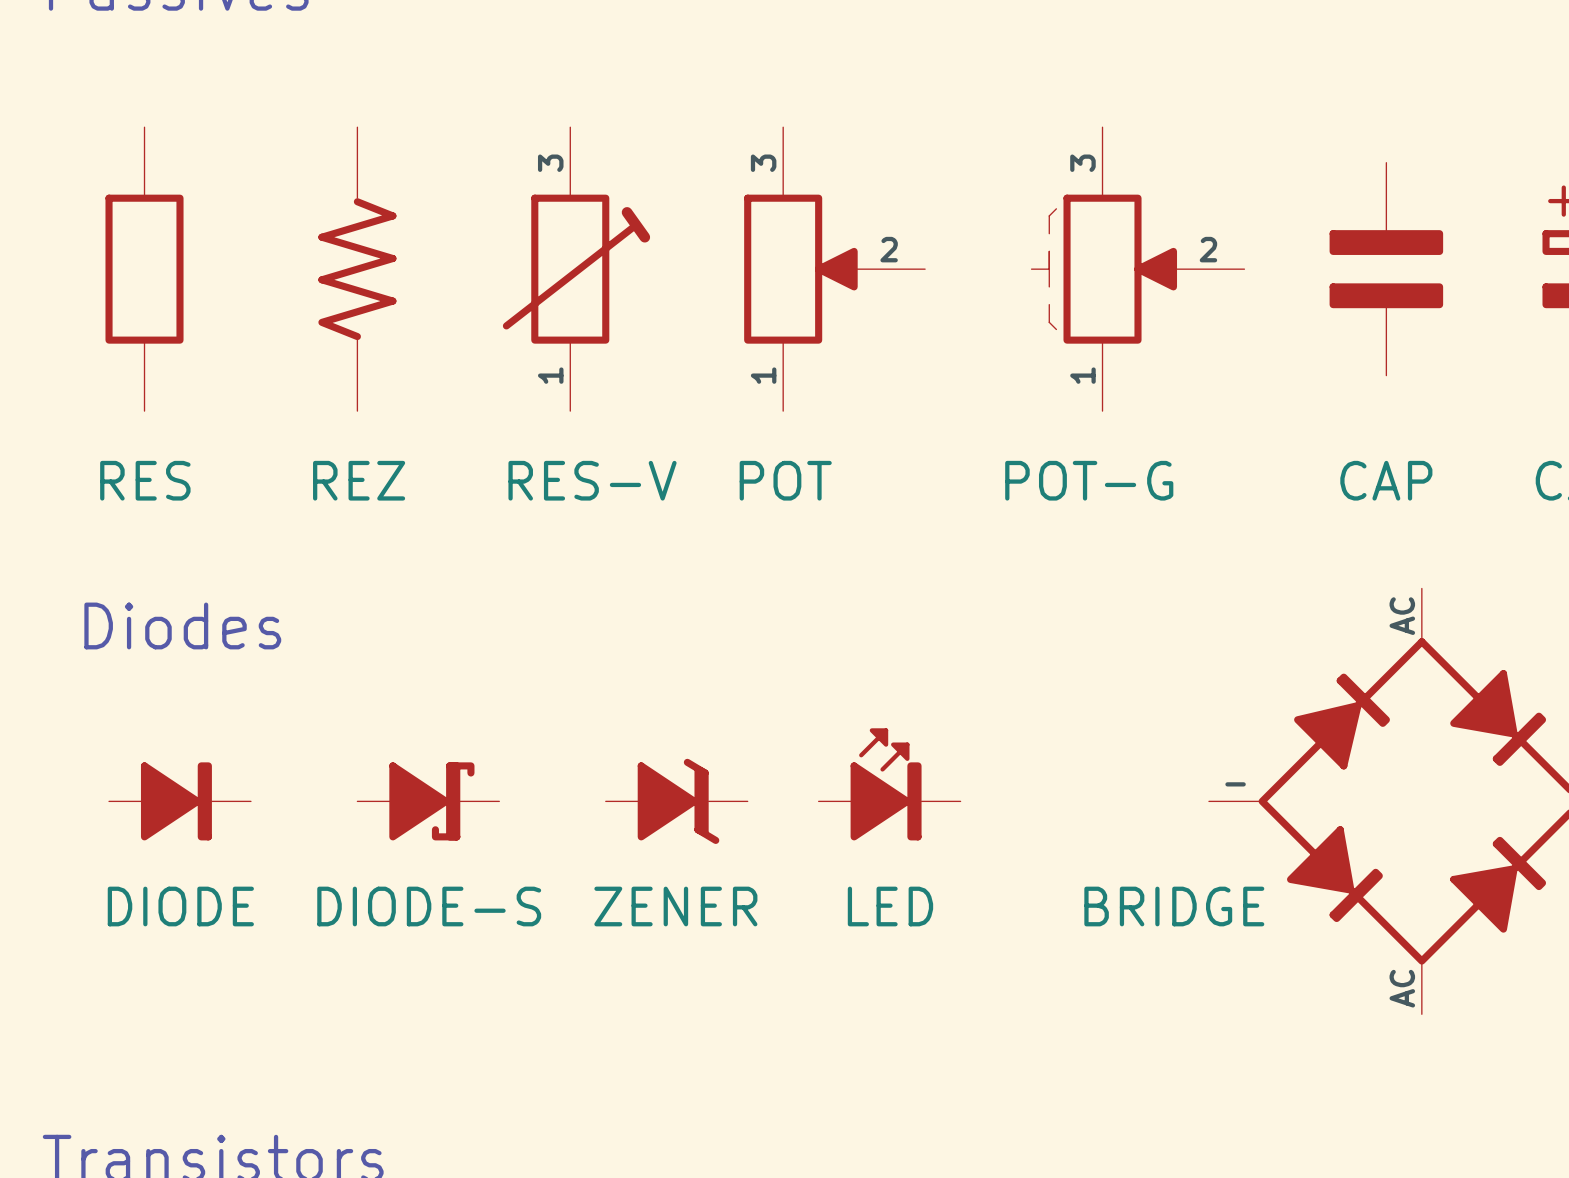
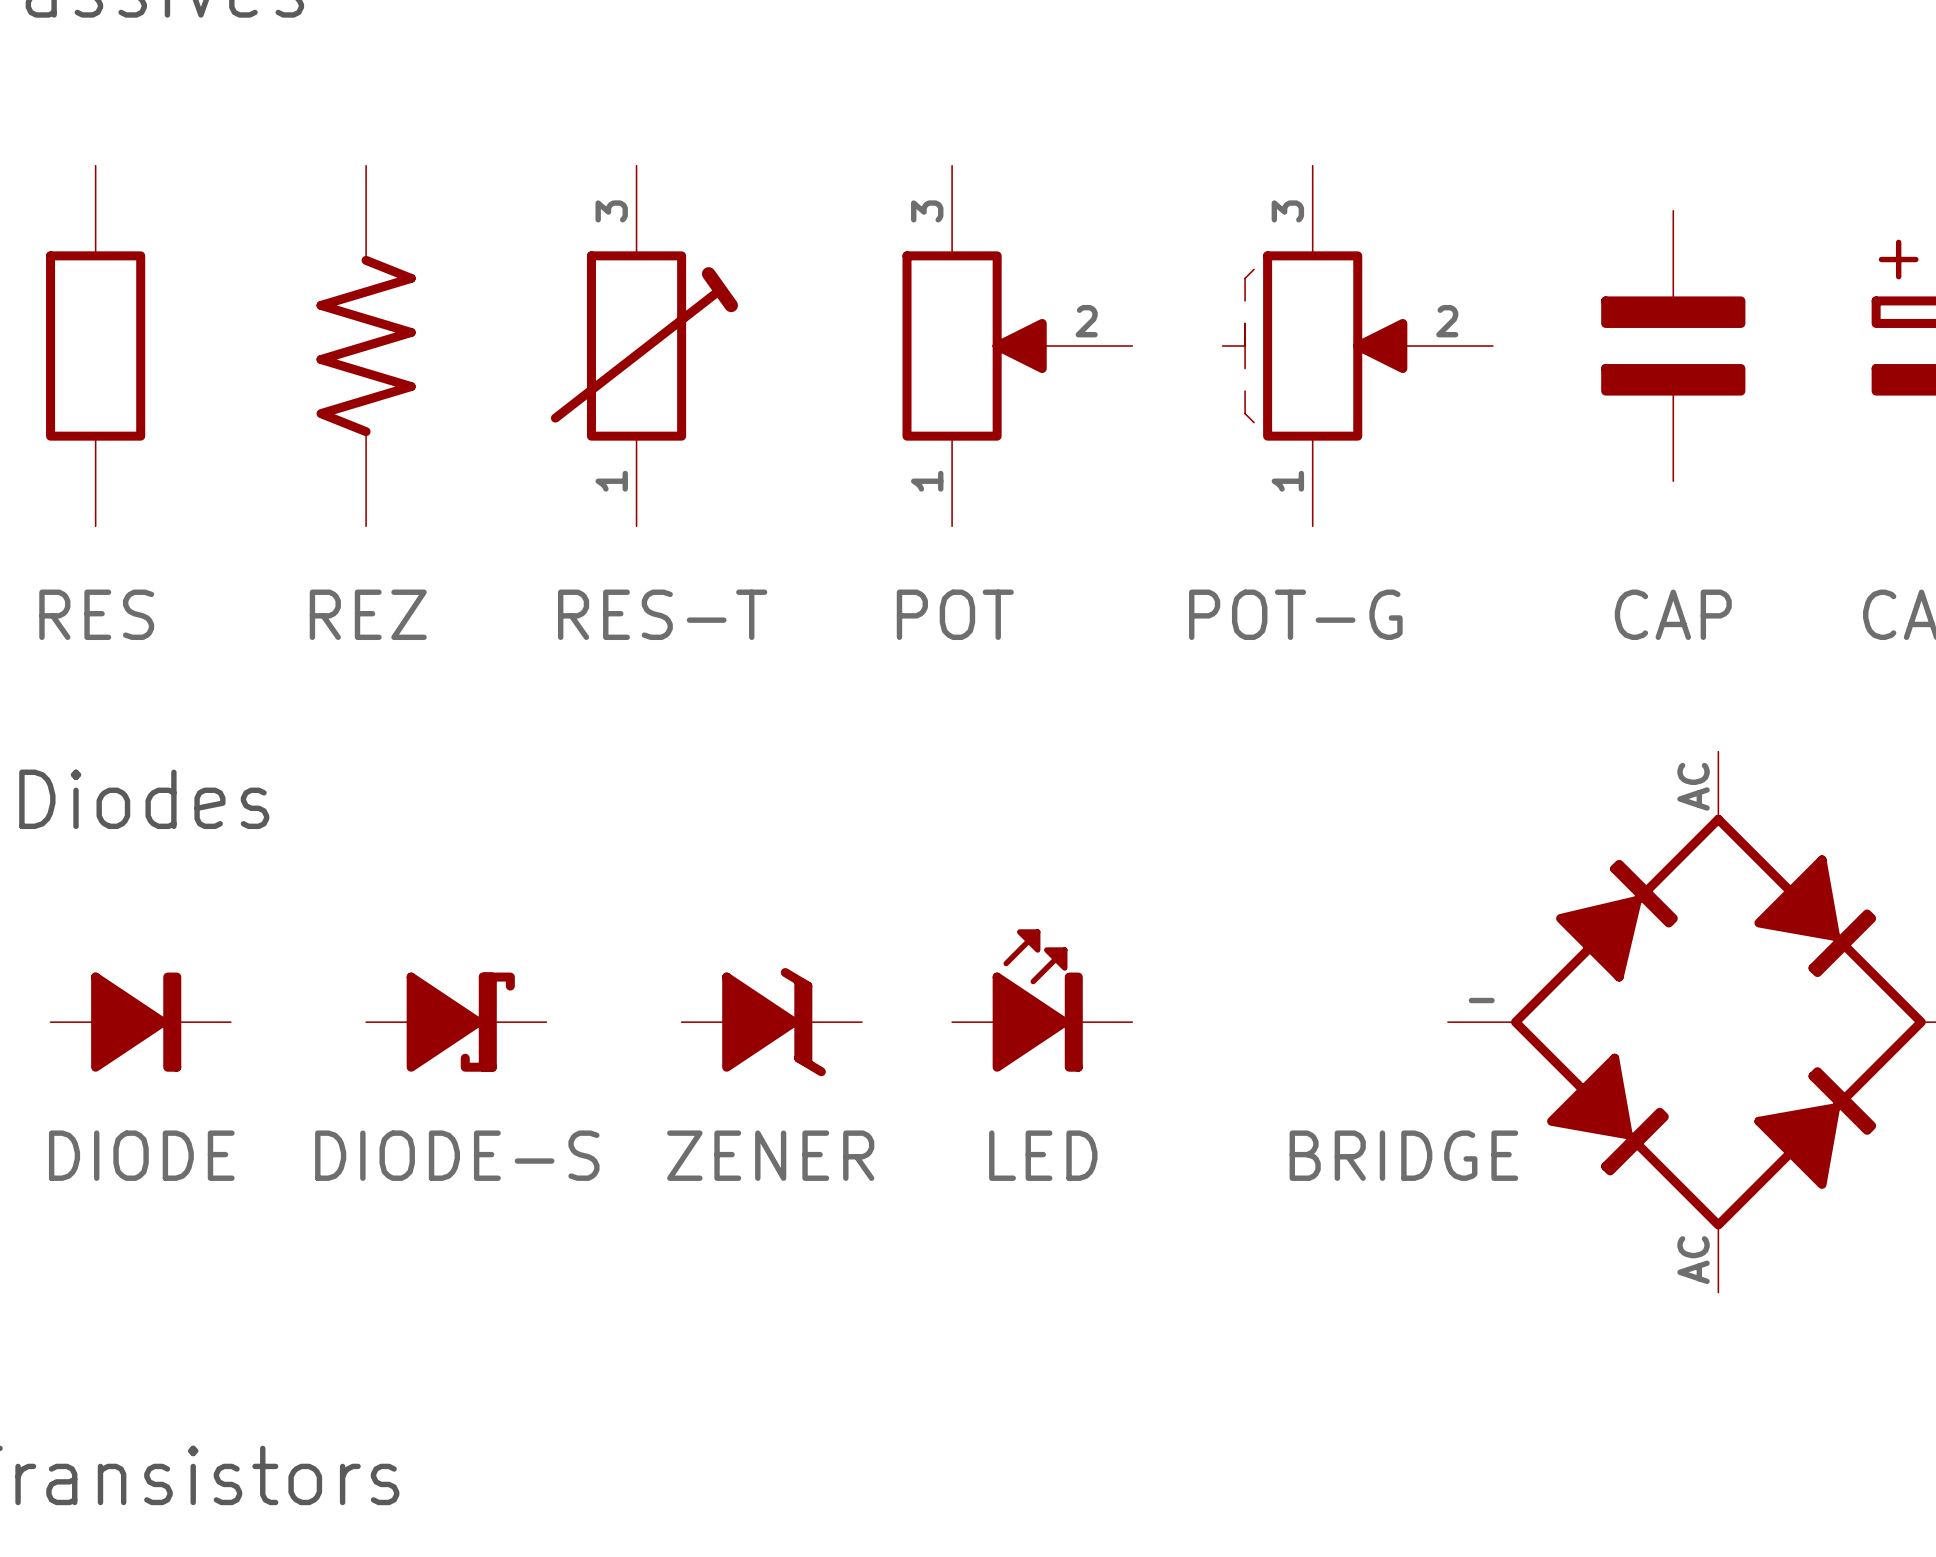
part position: (834, 269) -> (1017, 346)
part value: RES-V (592, 480) -> RES-T (662, 614)

